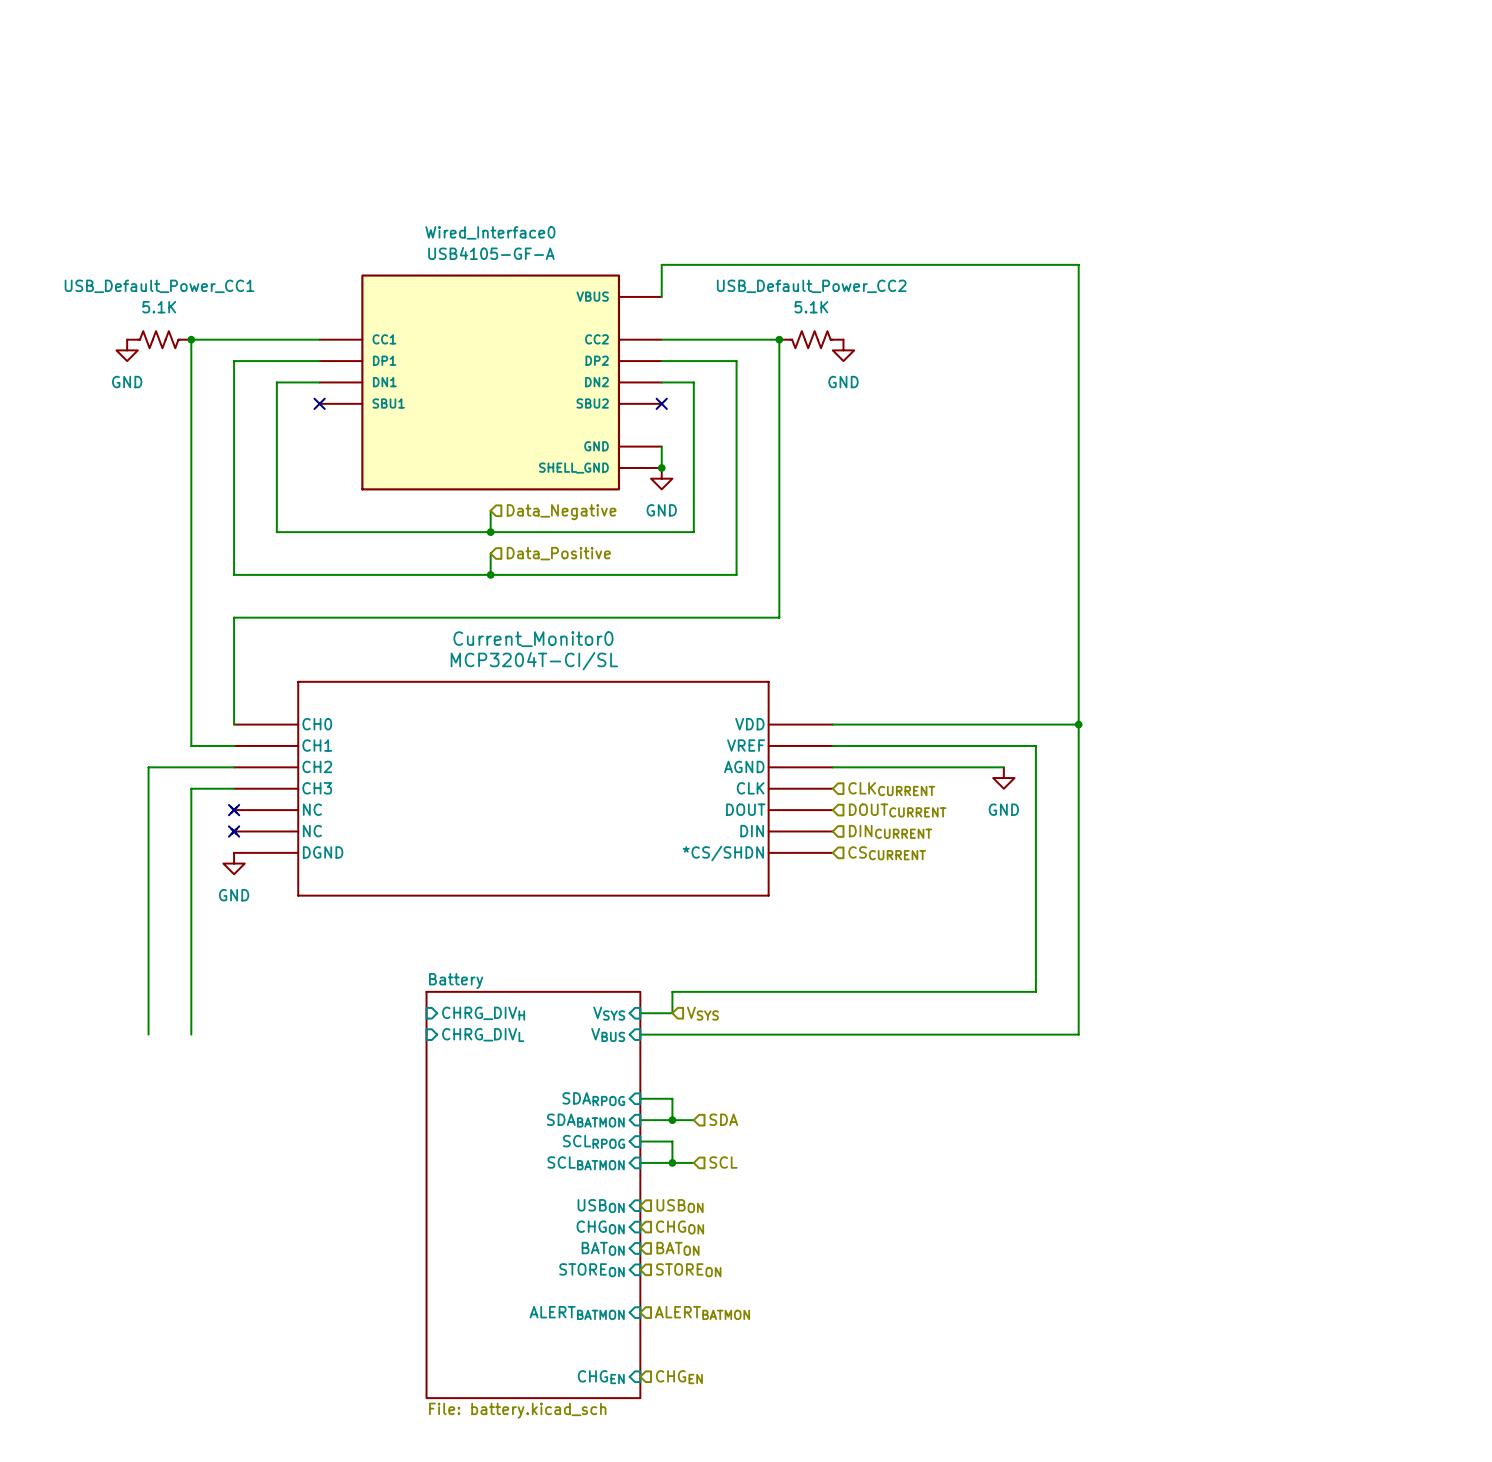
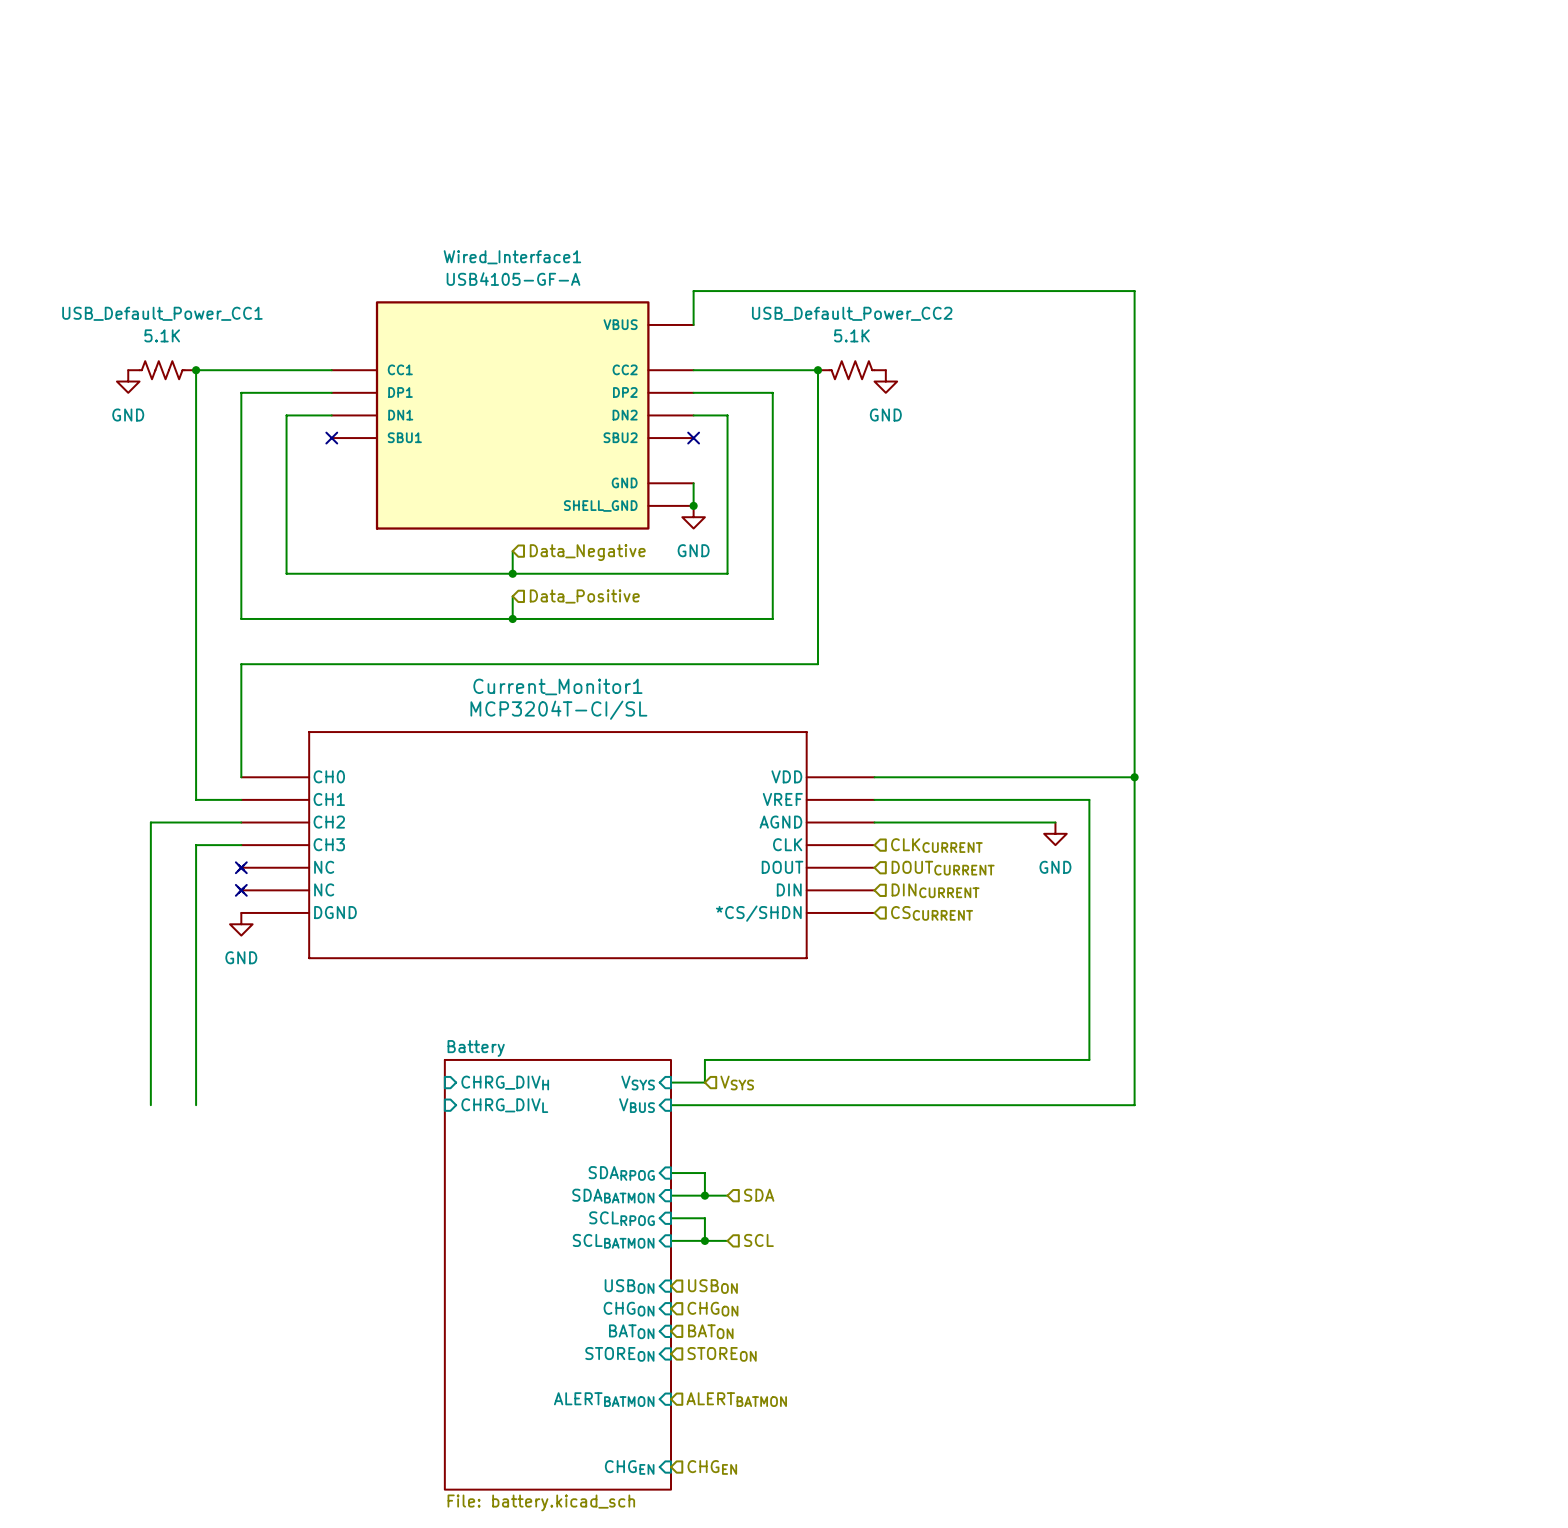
Wired_Interface0 name: Wired_Interface0 (490, 232) -> Wired_Interface1 (512, 257)
Current_Monitor0 name: Current_Monitor0 (533, 639) -> Current_Monitor1 (557, 686)

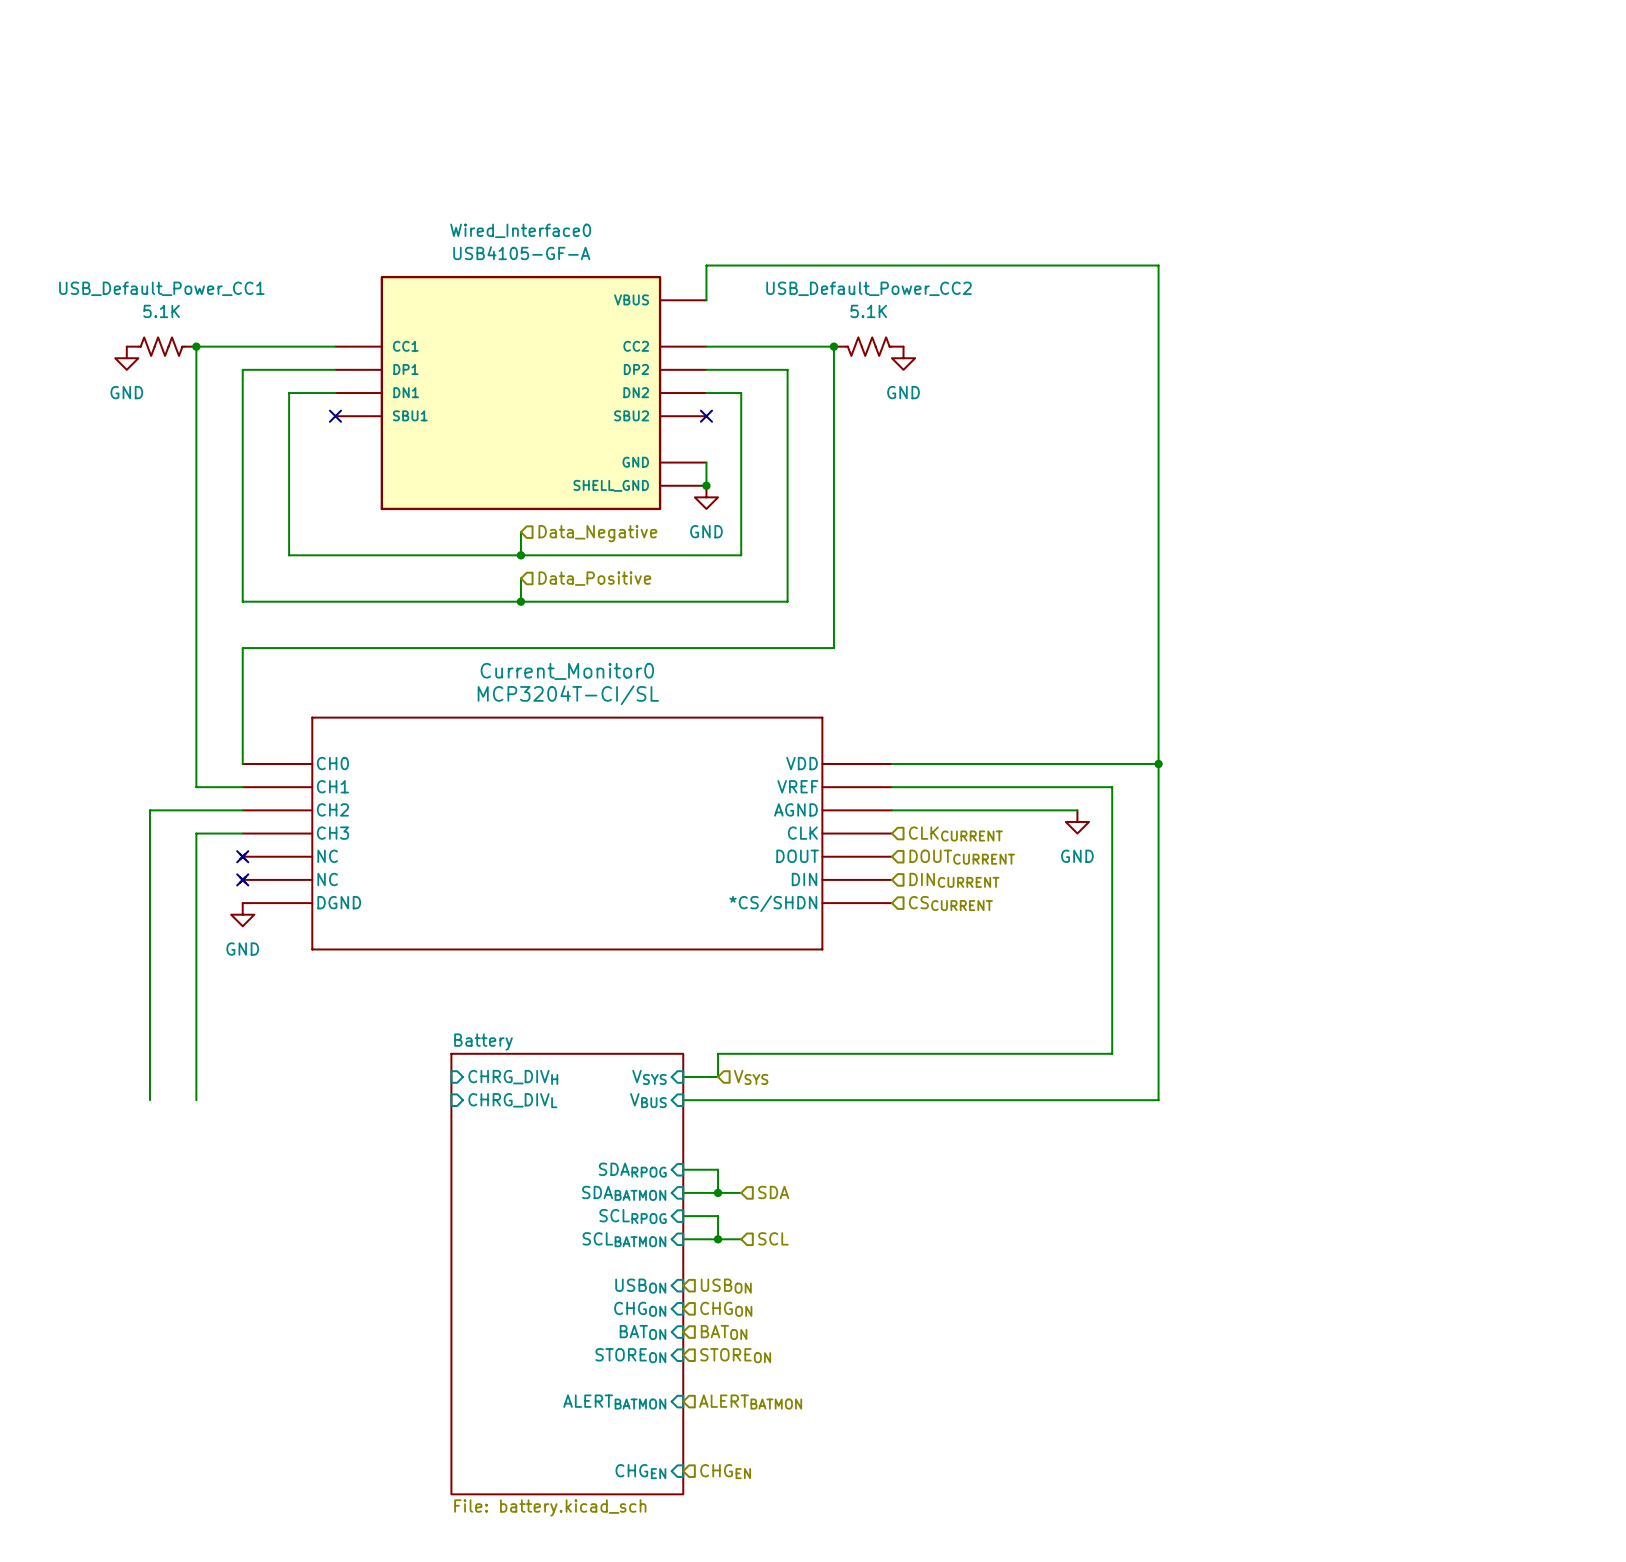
Wired_Interface1 name: Wired_Interface1 (512, 257) -> Wired_Interface0 (520, 230)
Current_Monitor1 name: Current_Monitor1 (557, 686) -> Current_Monitor0 (567, 671)

